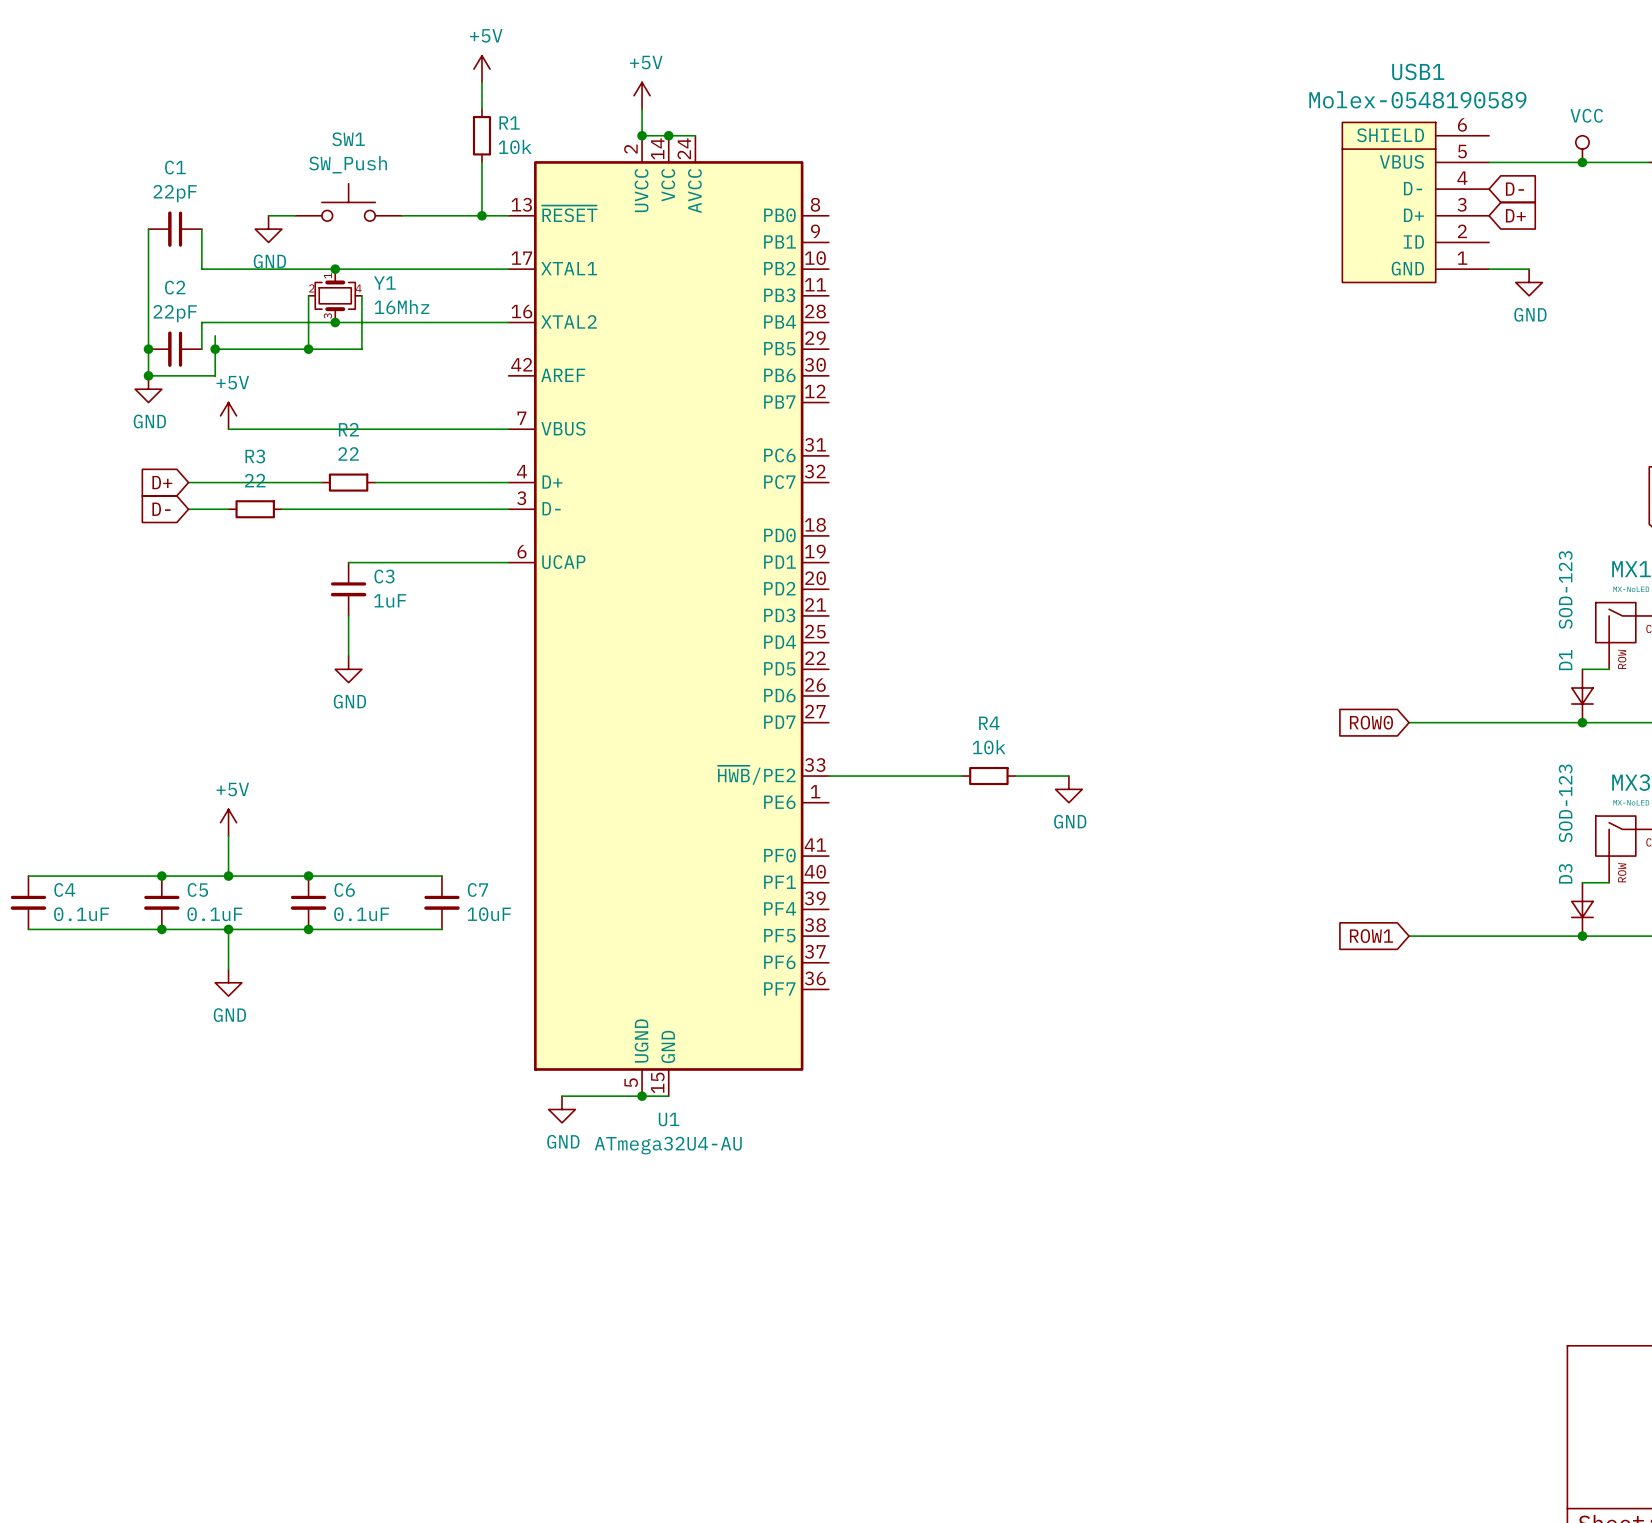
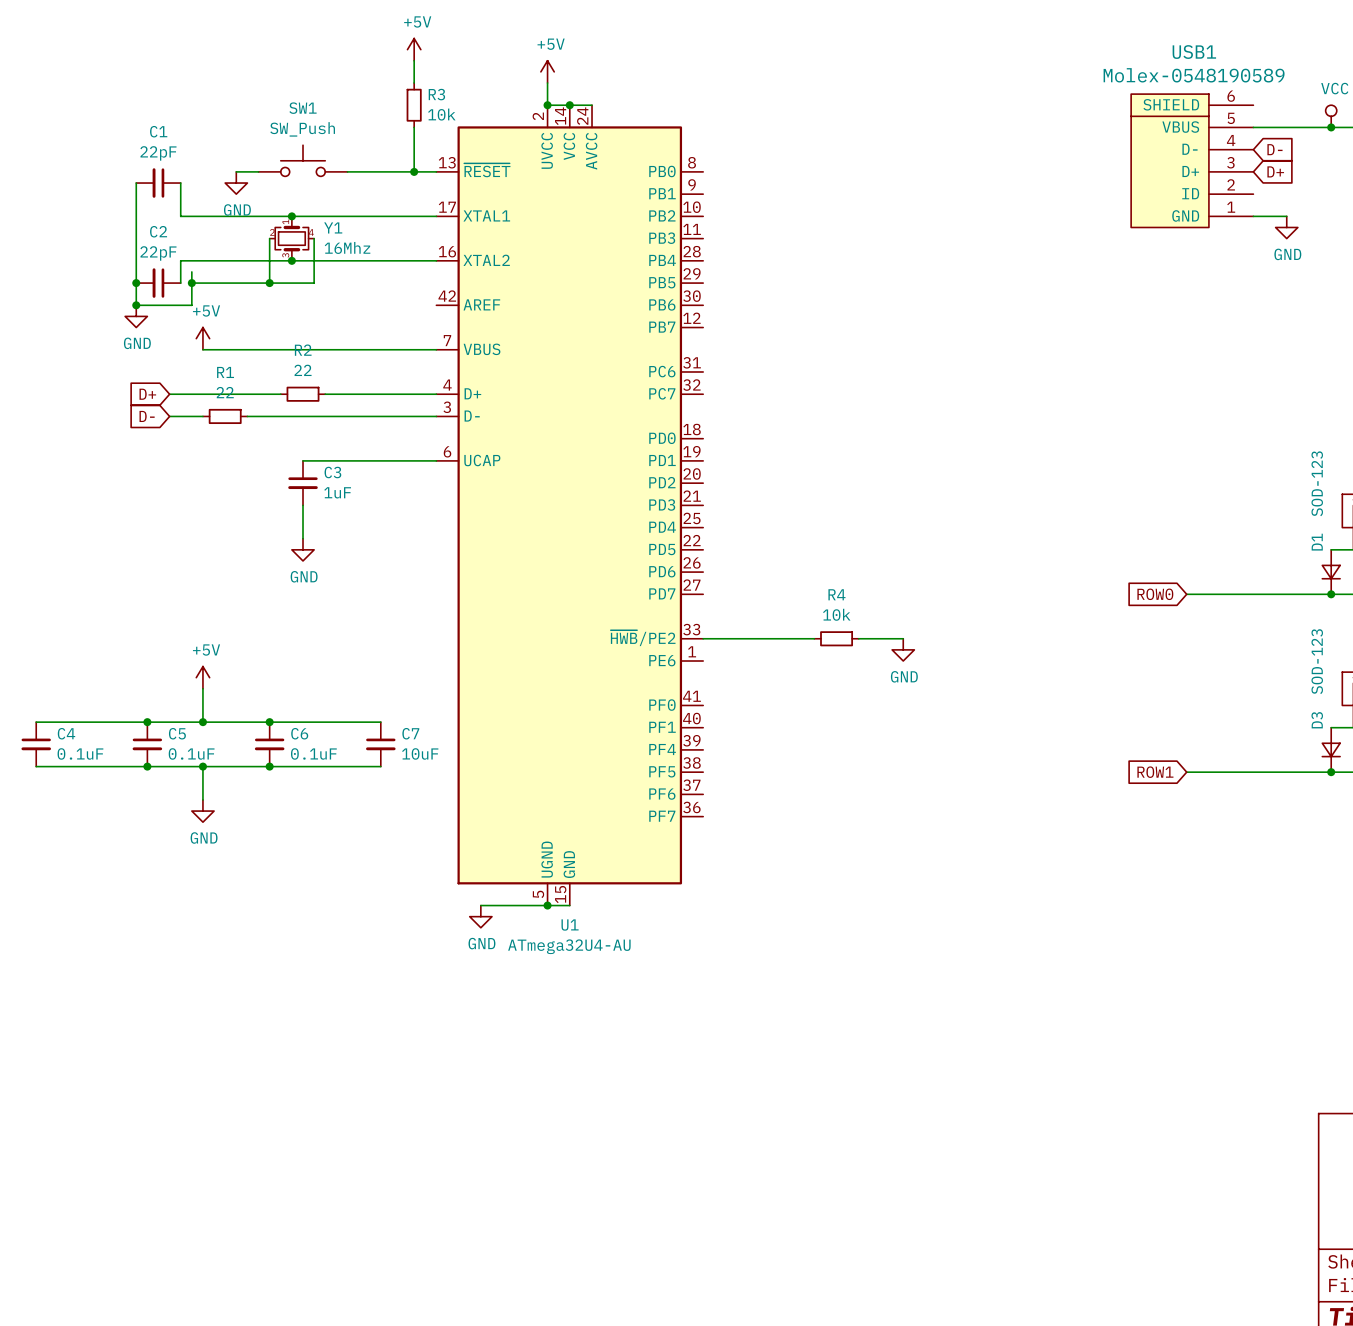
R1 name: R1 (509, 122) -> R3 (436, 94)
R3 name: R3 (255, 456) -> R1 (225, 372)

